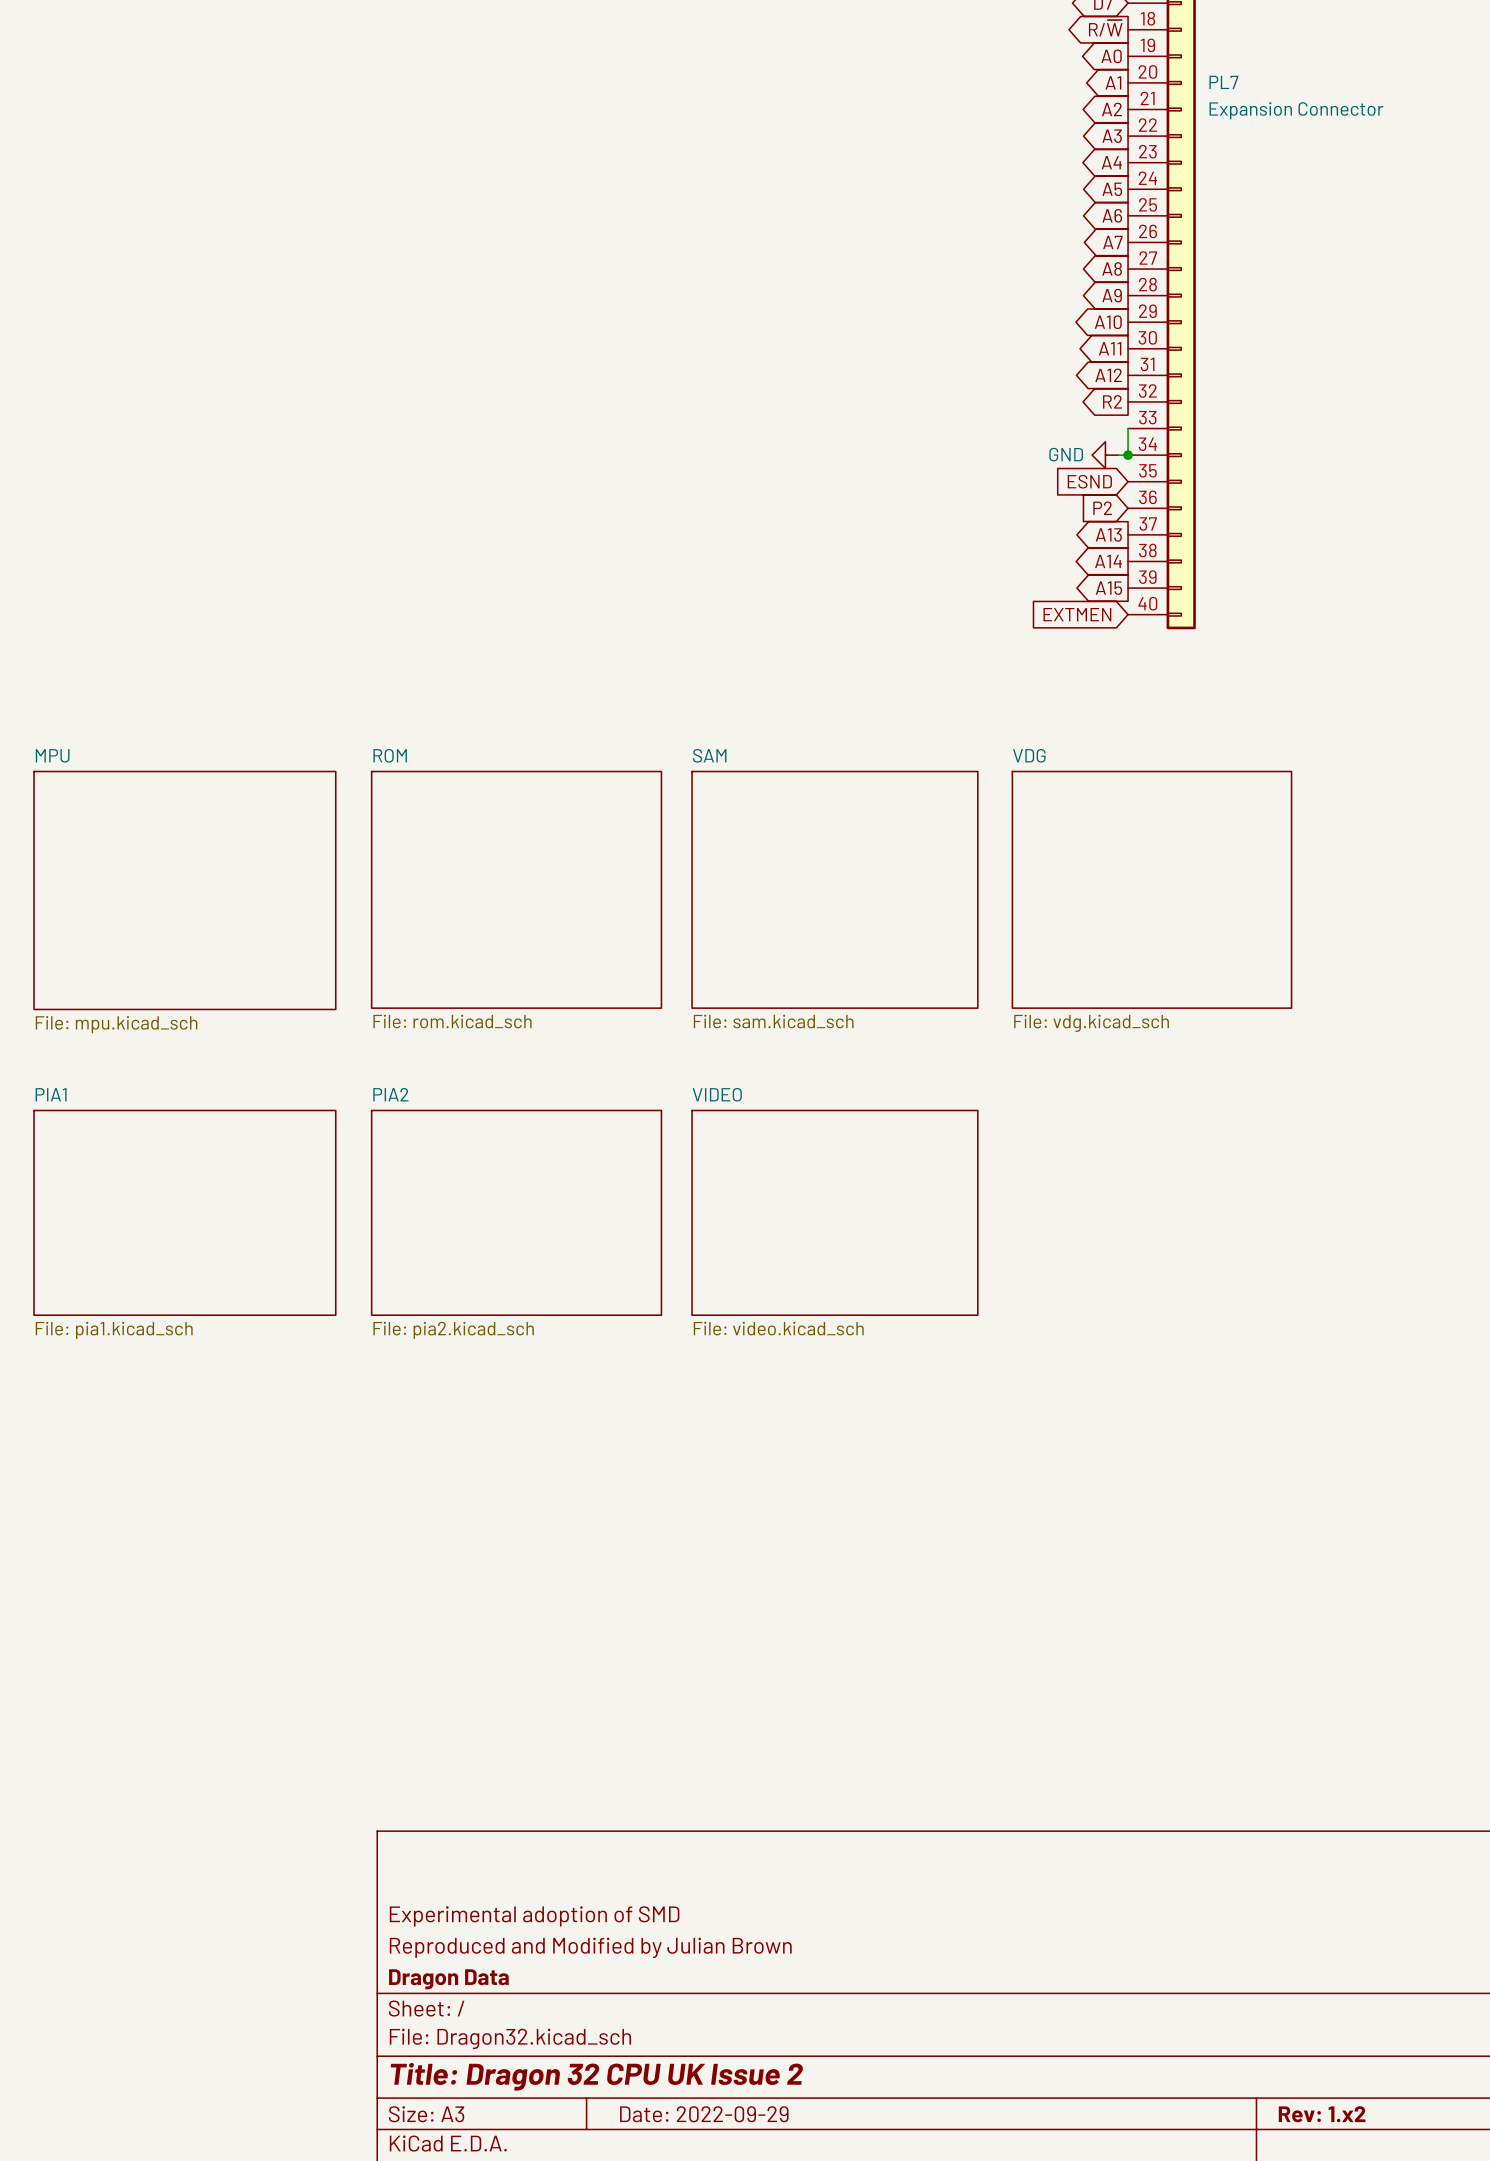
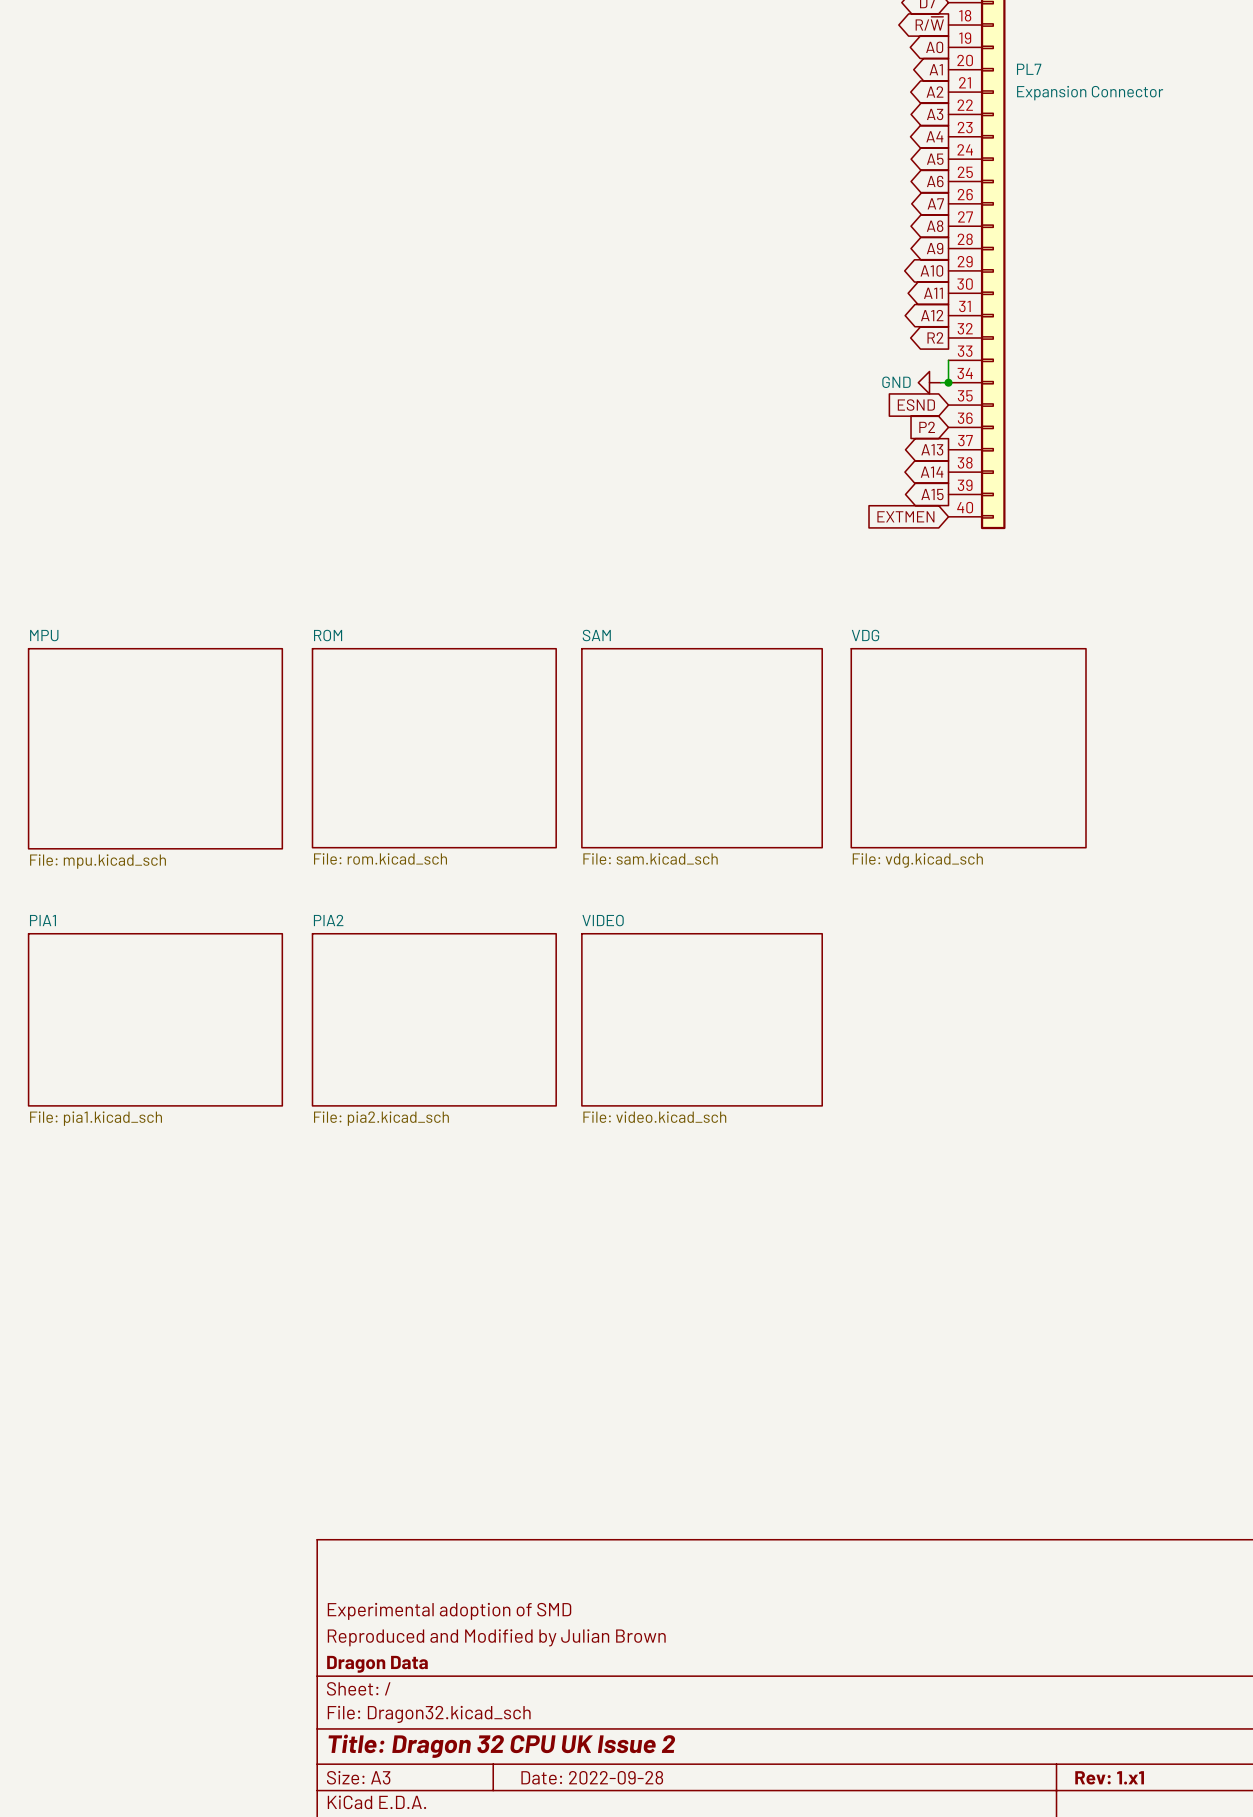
title block: Date: 2022-09-29 (704, 2114) -> Date: 2022-09-28 (592, 1777)
title block: Rev: 1.x2 (1322, 2114) -> Rev: 1.x1 (1109, 1777)

